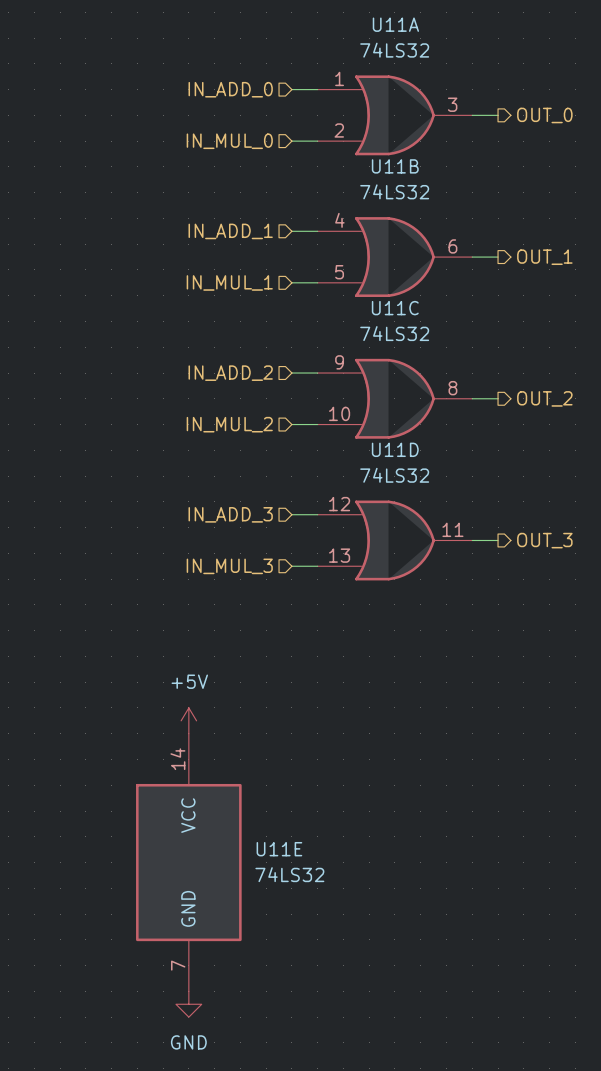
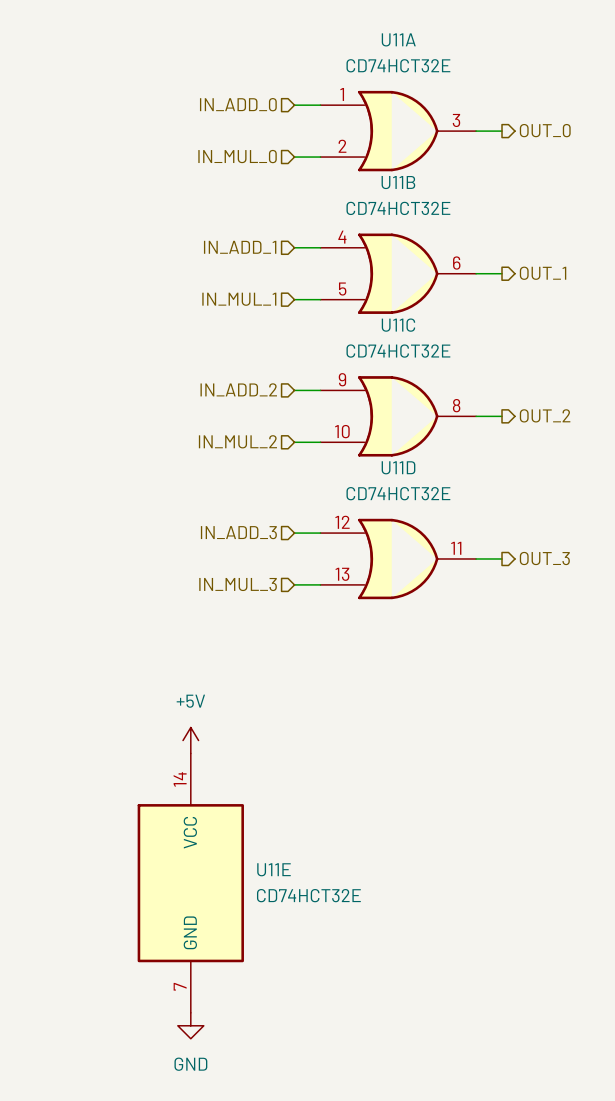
U11A value: 74LS32 (394, 50) -> CD74HCT32E (398, 65)
U11B value: 74LS32 (394, 191) -> CD74HCT32E (398, 208)
U11C value: 74LS32 (394, 333) -> CD74HCT32E (398, 351)
U11D value: 74LS32 (394, 475) -> CD74HCT32E (398, 493)
U11E value: 74LS32 (289, 874) -> CD74HCT32E (308, 895)

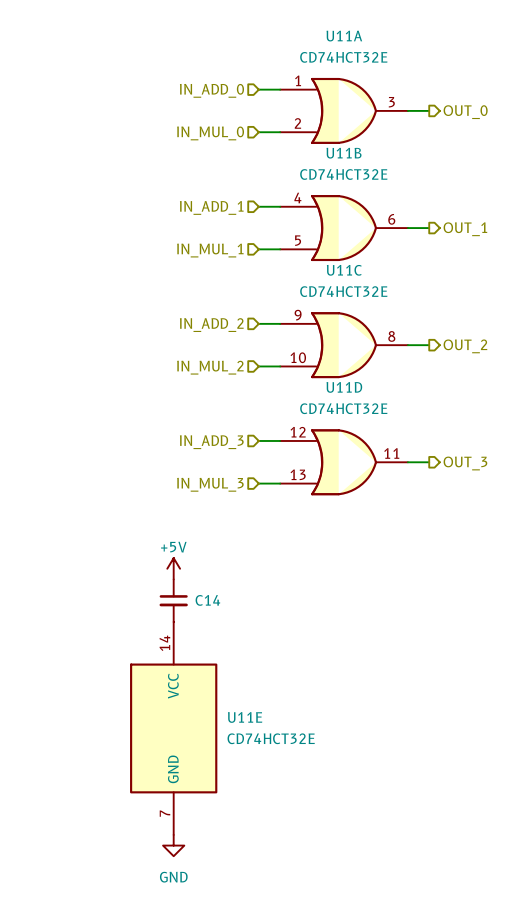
power symbol text position: +5V (190, 701) -> +5V (173, 547)
C14: none -> (173, 600)
power symbol position: +5V (190, 740) -> +5V (173, 568)

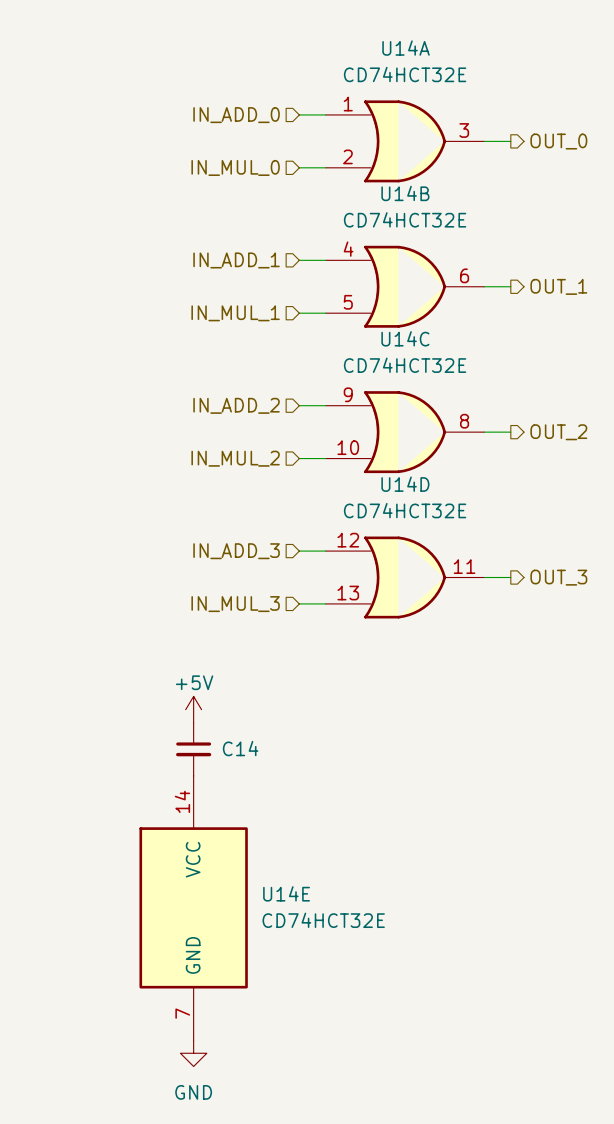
U11A name: U11A (344, 36) -> U14A (406, 48)
U11B name: U11B (344, 153) -> U14B (405, 193)
U11C name: U11C (344, 270) -> U14C (405, 338)
U11D name: U11D (344, 387) -> U14D (405, 484)
U11E name: U11E (245, 717) -> U14E (286, 893)

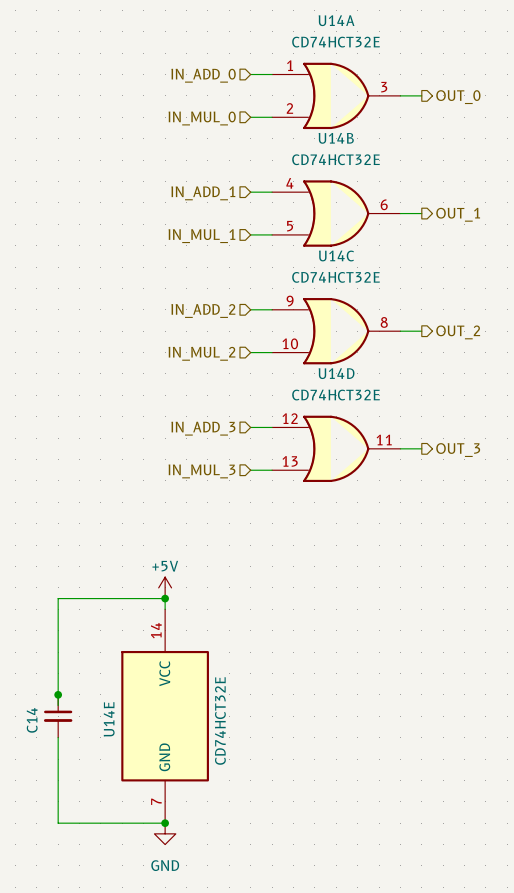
power symbol position: +5V (193, 709) -> +5V (165, 587)
C14 name rotation: 0° (240, 748) -> 90° counterclockwise (32, 720)
C14 name position: C14 (240, 748) -> C14 (32, 720)
C14 position: (193, 749) -> (58, 716)
junction: none -> (165, 598)
wire: none -> (165, 609) (165, 598) (58, 598) (58, 705)
junction: none -> (58, 694)
U14E name rotation: 0° (286, 893) -> 90° counterclockwise (109, 719)
U14E name position: U14E (286, 893) -> U14E (109, 719)
U14E value rotation: 0° (323, 920) -> 90° counterclockwise (220, 720)
wire: none -> (58, 737) (58, 823) (165, 823)
junction: none -> (165, 823)

